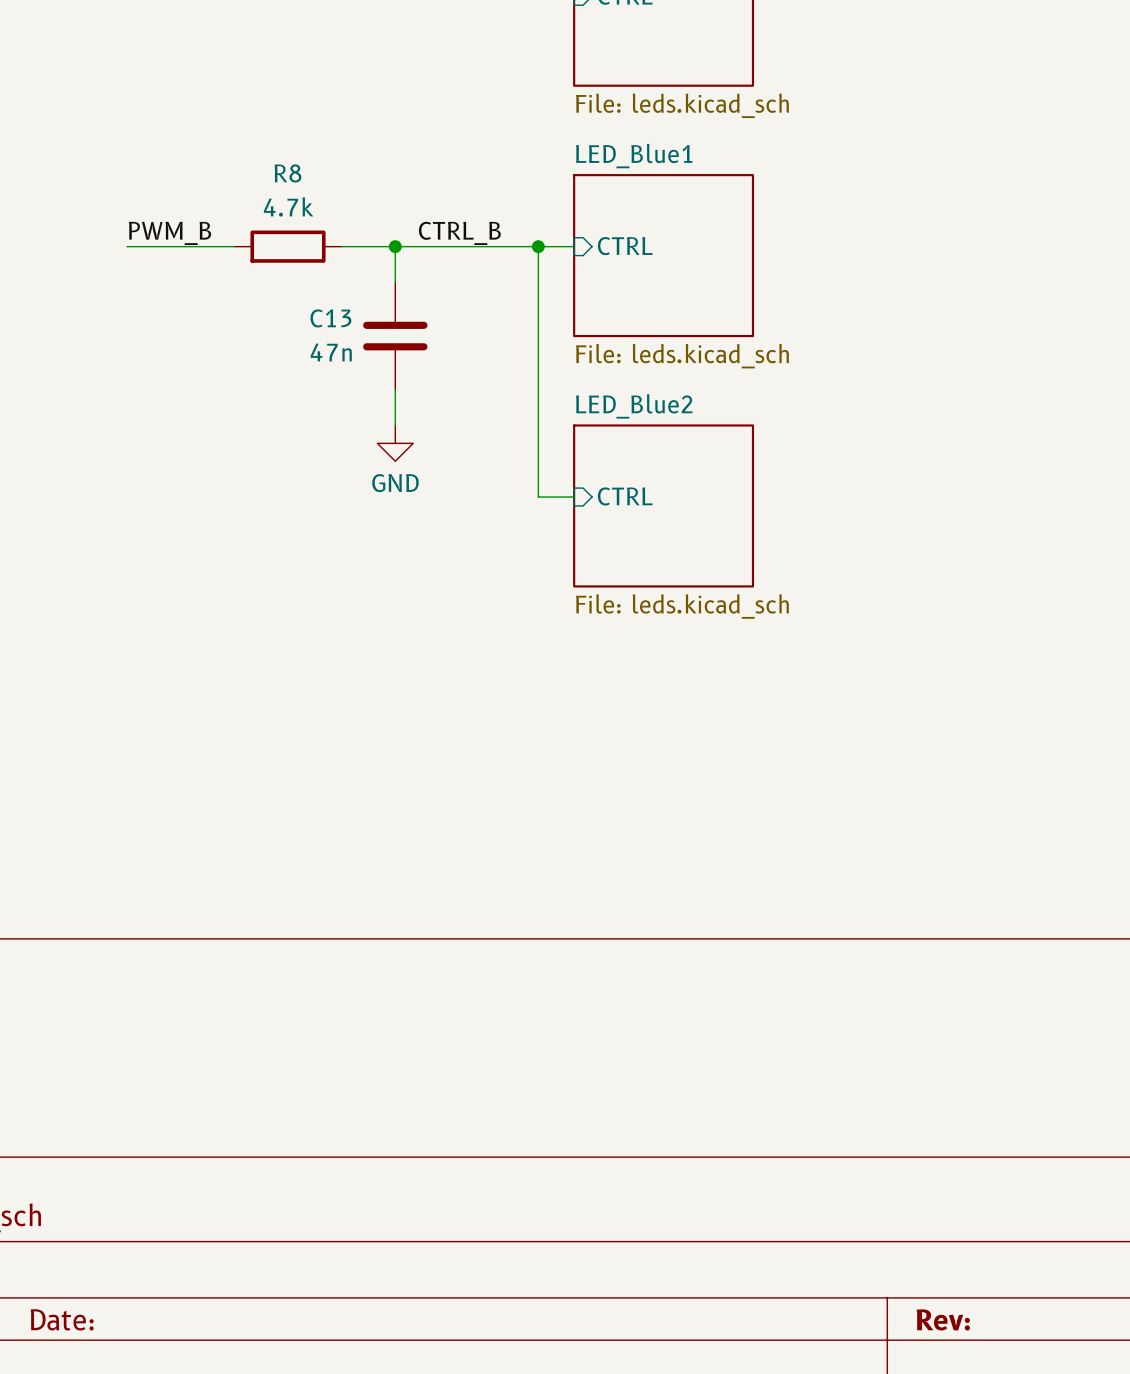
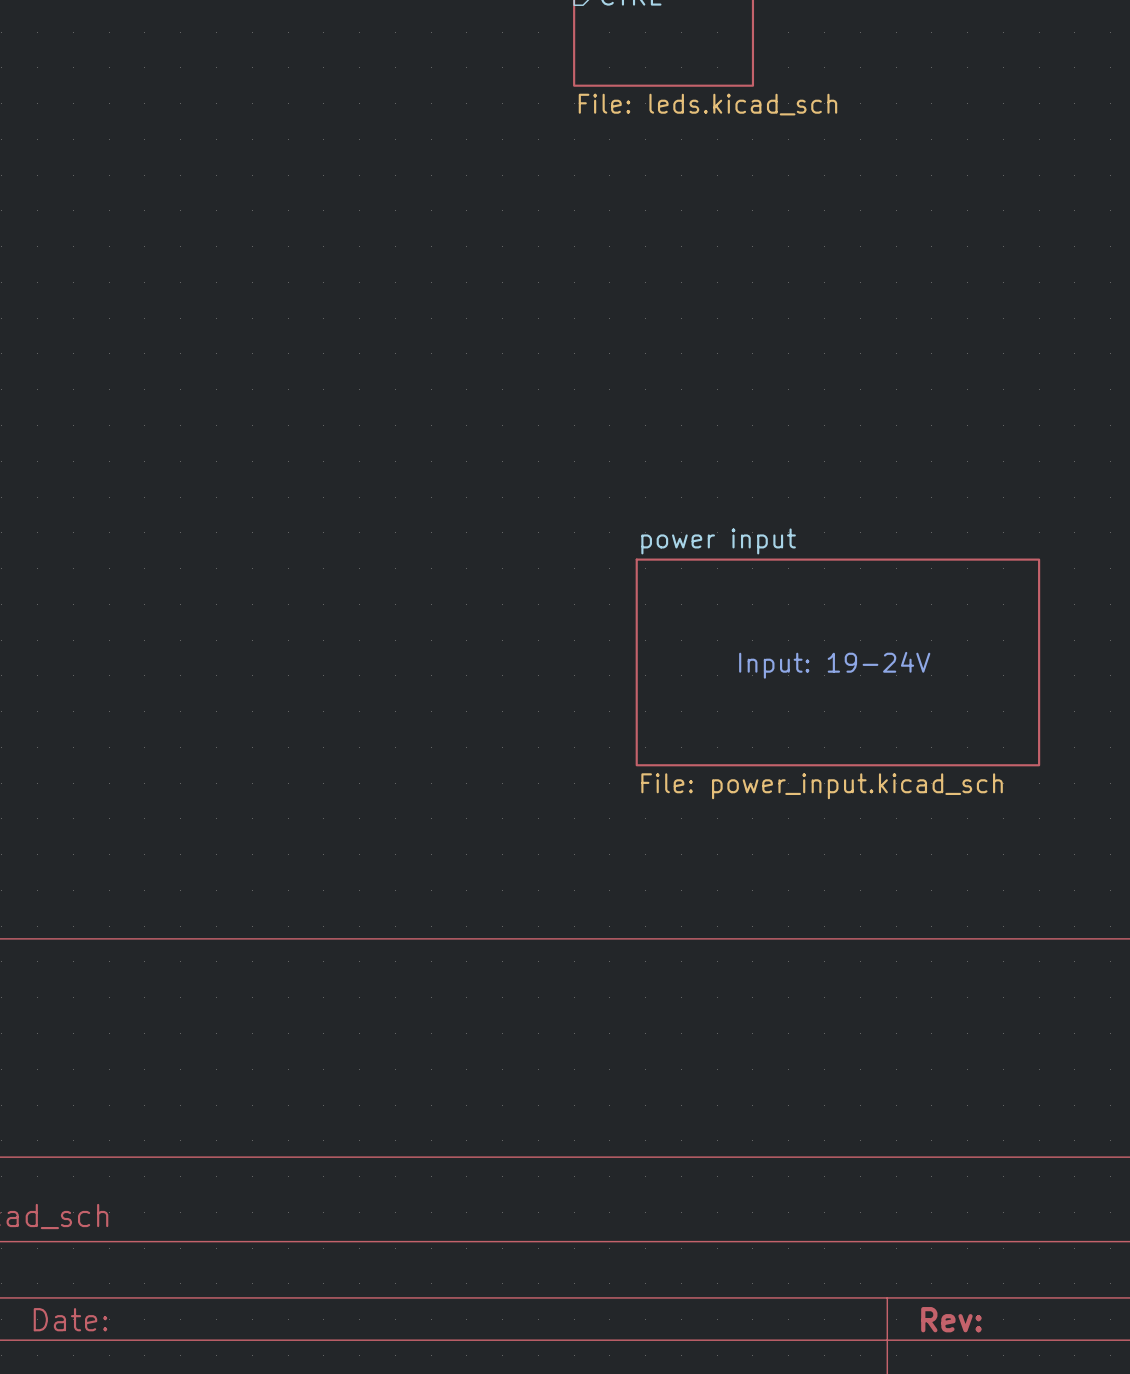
label: PWM_B (169, 233) -> none
label: CTRL_B (459, 233) -> none
wire: (127, 246) (234, 246) -> none
R8: 4.7k (288, 246) -> none
wire: (341, 246) (574, 246) -> none
wire: (395, 246) (395, 282) -> none
junction: (395, 246) -> none
wire: (538, 246) (538, 497) (574, 497) -> none
junction: (538, 246) -> none
sheet pin: CTRL (625, 246) -> none
sheet LED_Blue1: File: leds.kicad_sch (663, 255) -> none
C13: 47n (395, 336) -> none
wire: (395, 389) (395, 425) -> none
power symbol: GND (395, 443) -> none
sheet pin: CTRL (625, 496) -> none
sheet LED_Blue2: File: leds.kicad_sch (663, 505) -> none
sheet power input: none -> File: power_input.kicad_sch (837, 662)
text: none -> Input: 19-24V (834, 665)

